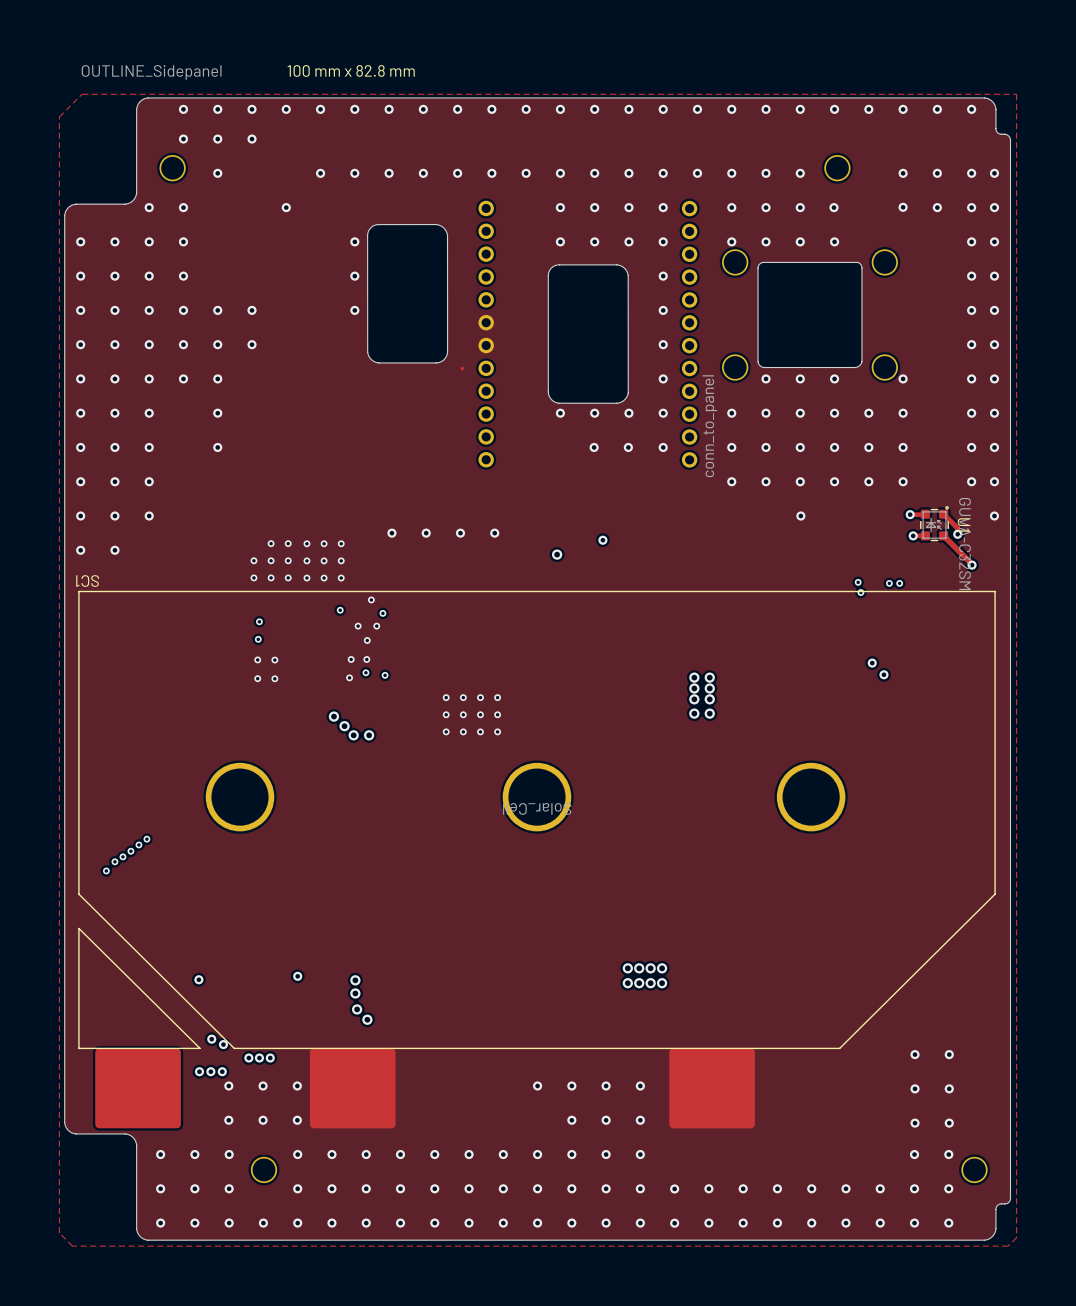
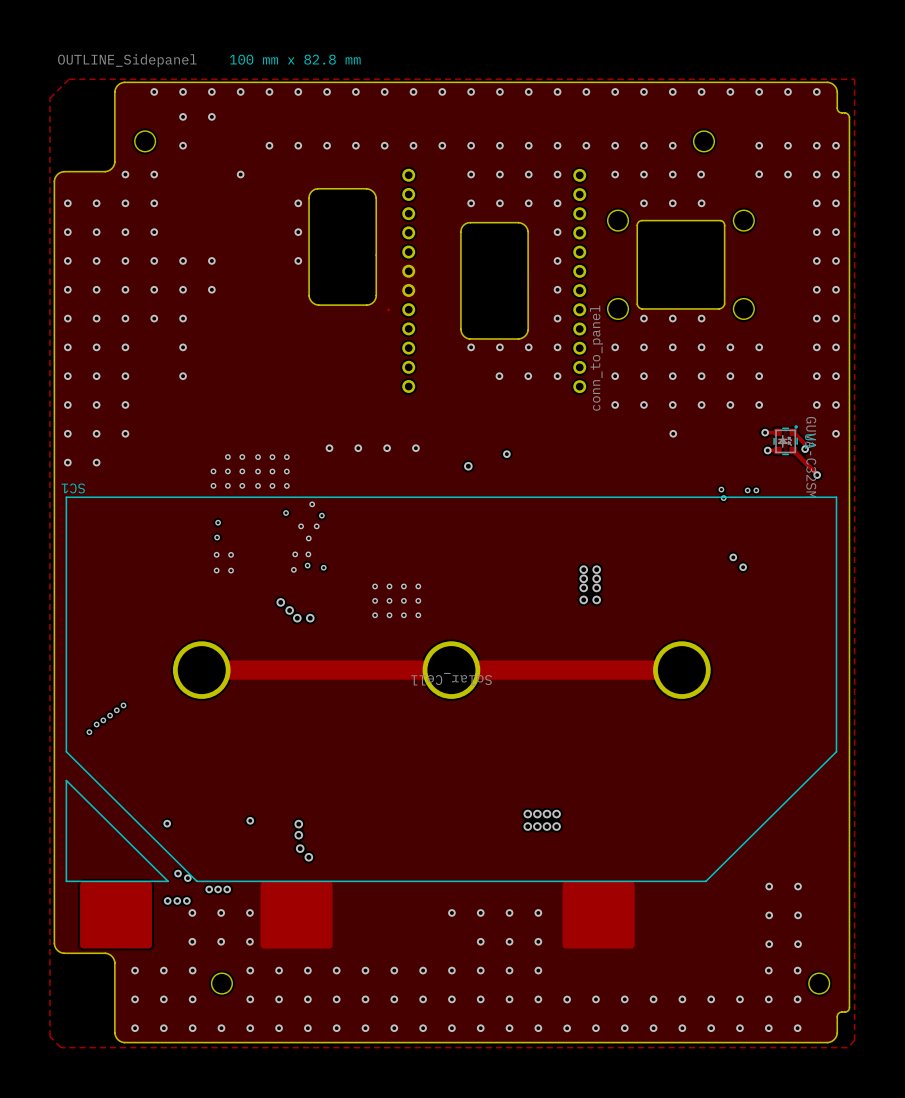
via: (183, 139) -> none
via: (731, 241) -> none
via: (903, 378) -> none
track: none -> (201, 670) (681, 670)

